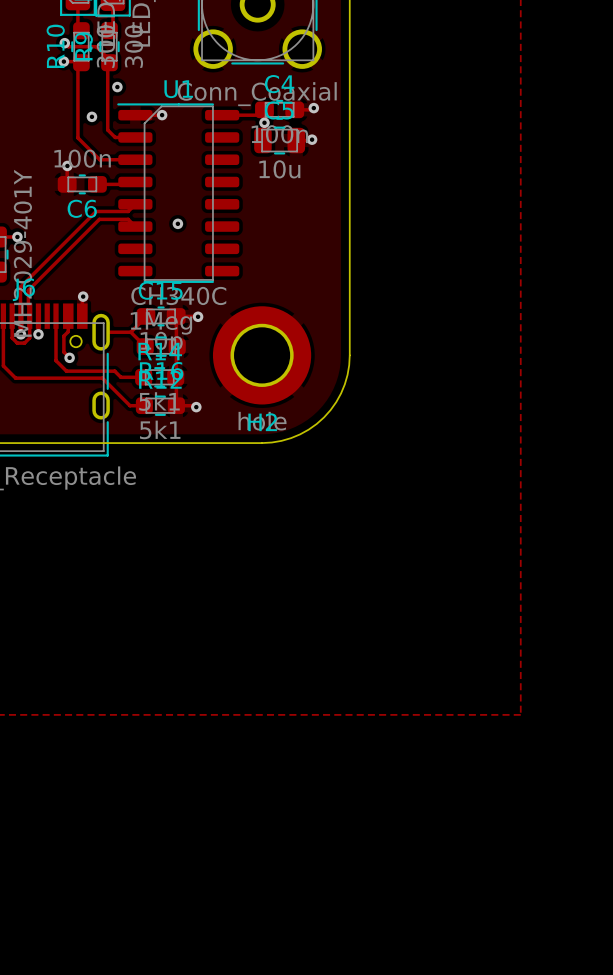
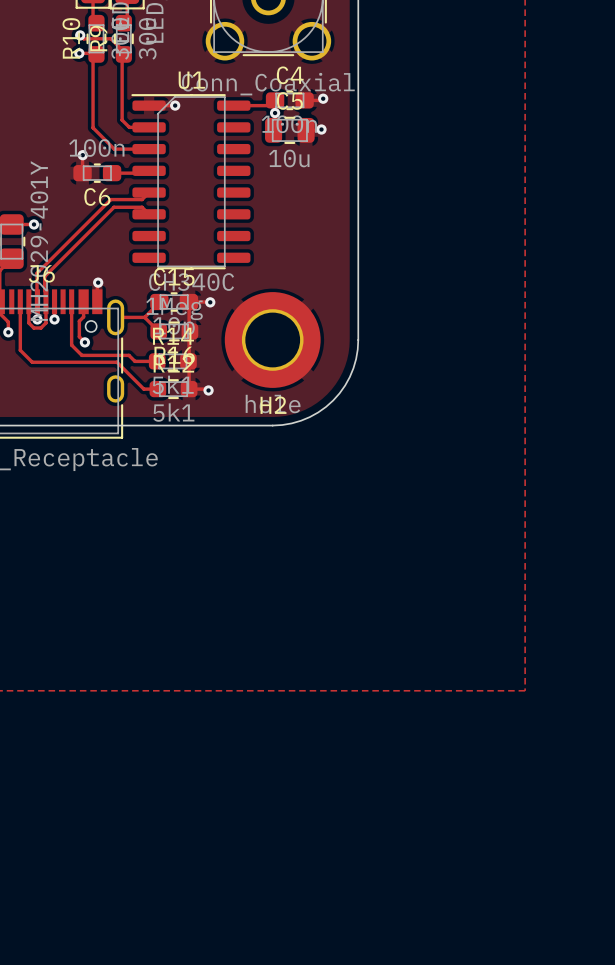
via: (117, 87) -> none
via: (91, 116) -> none
via: (177, 223) -> none

